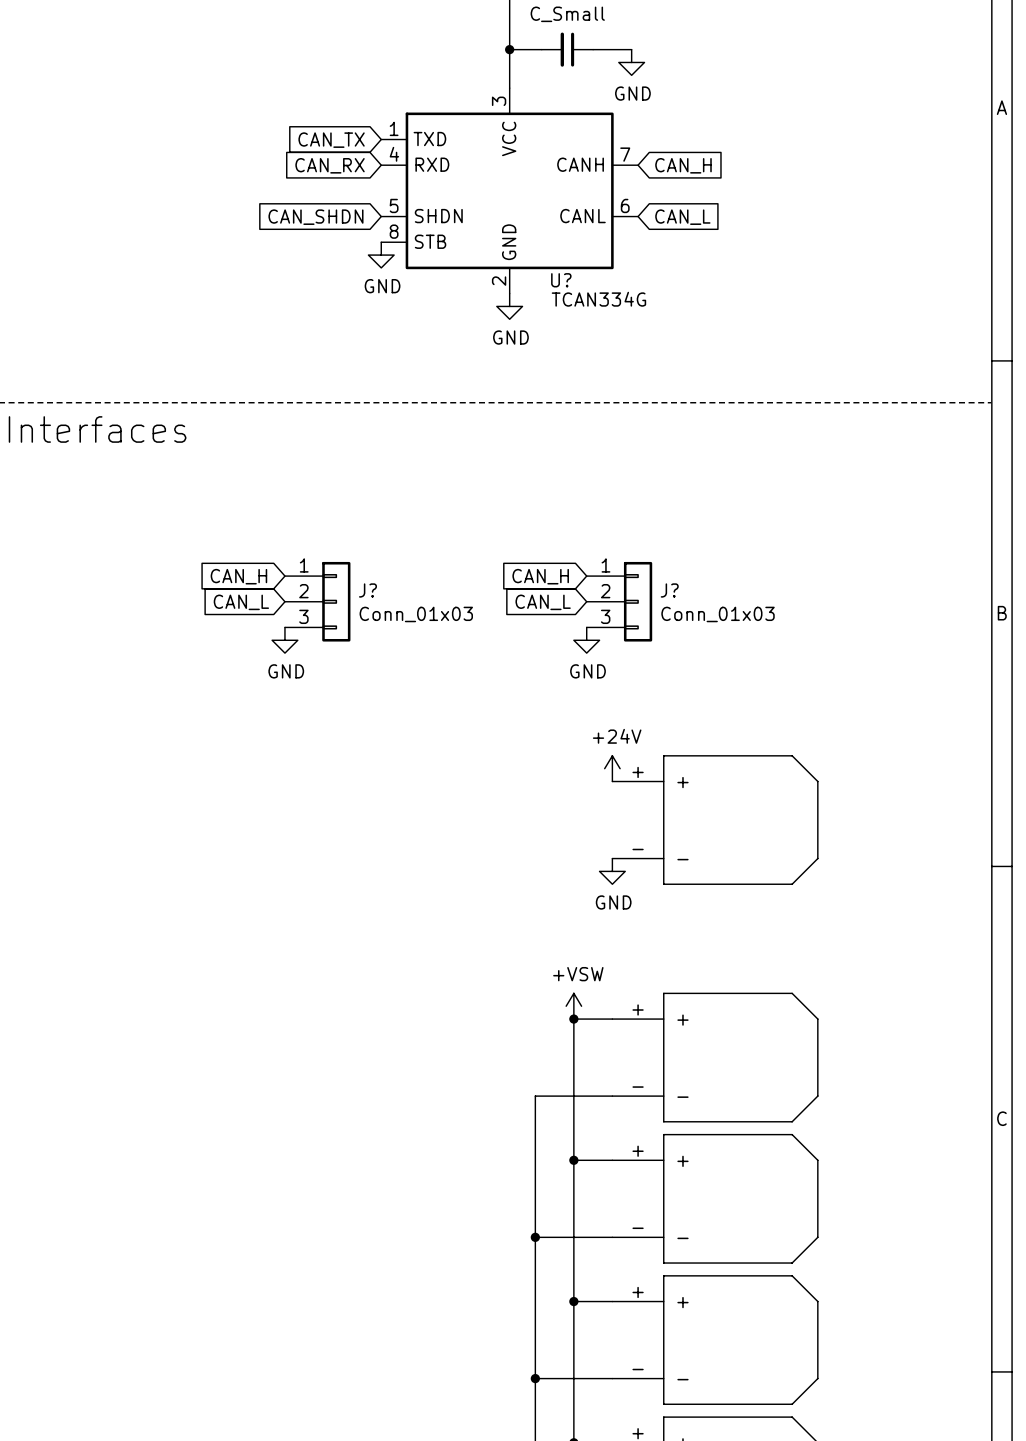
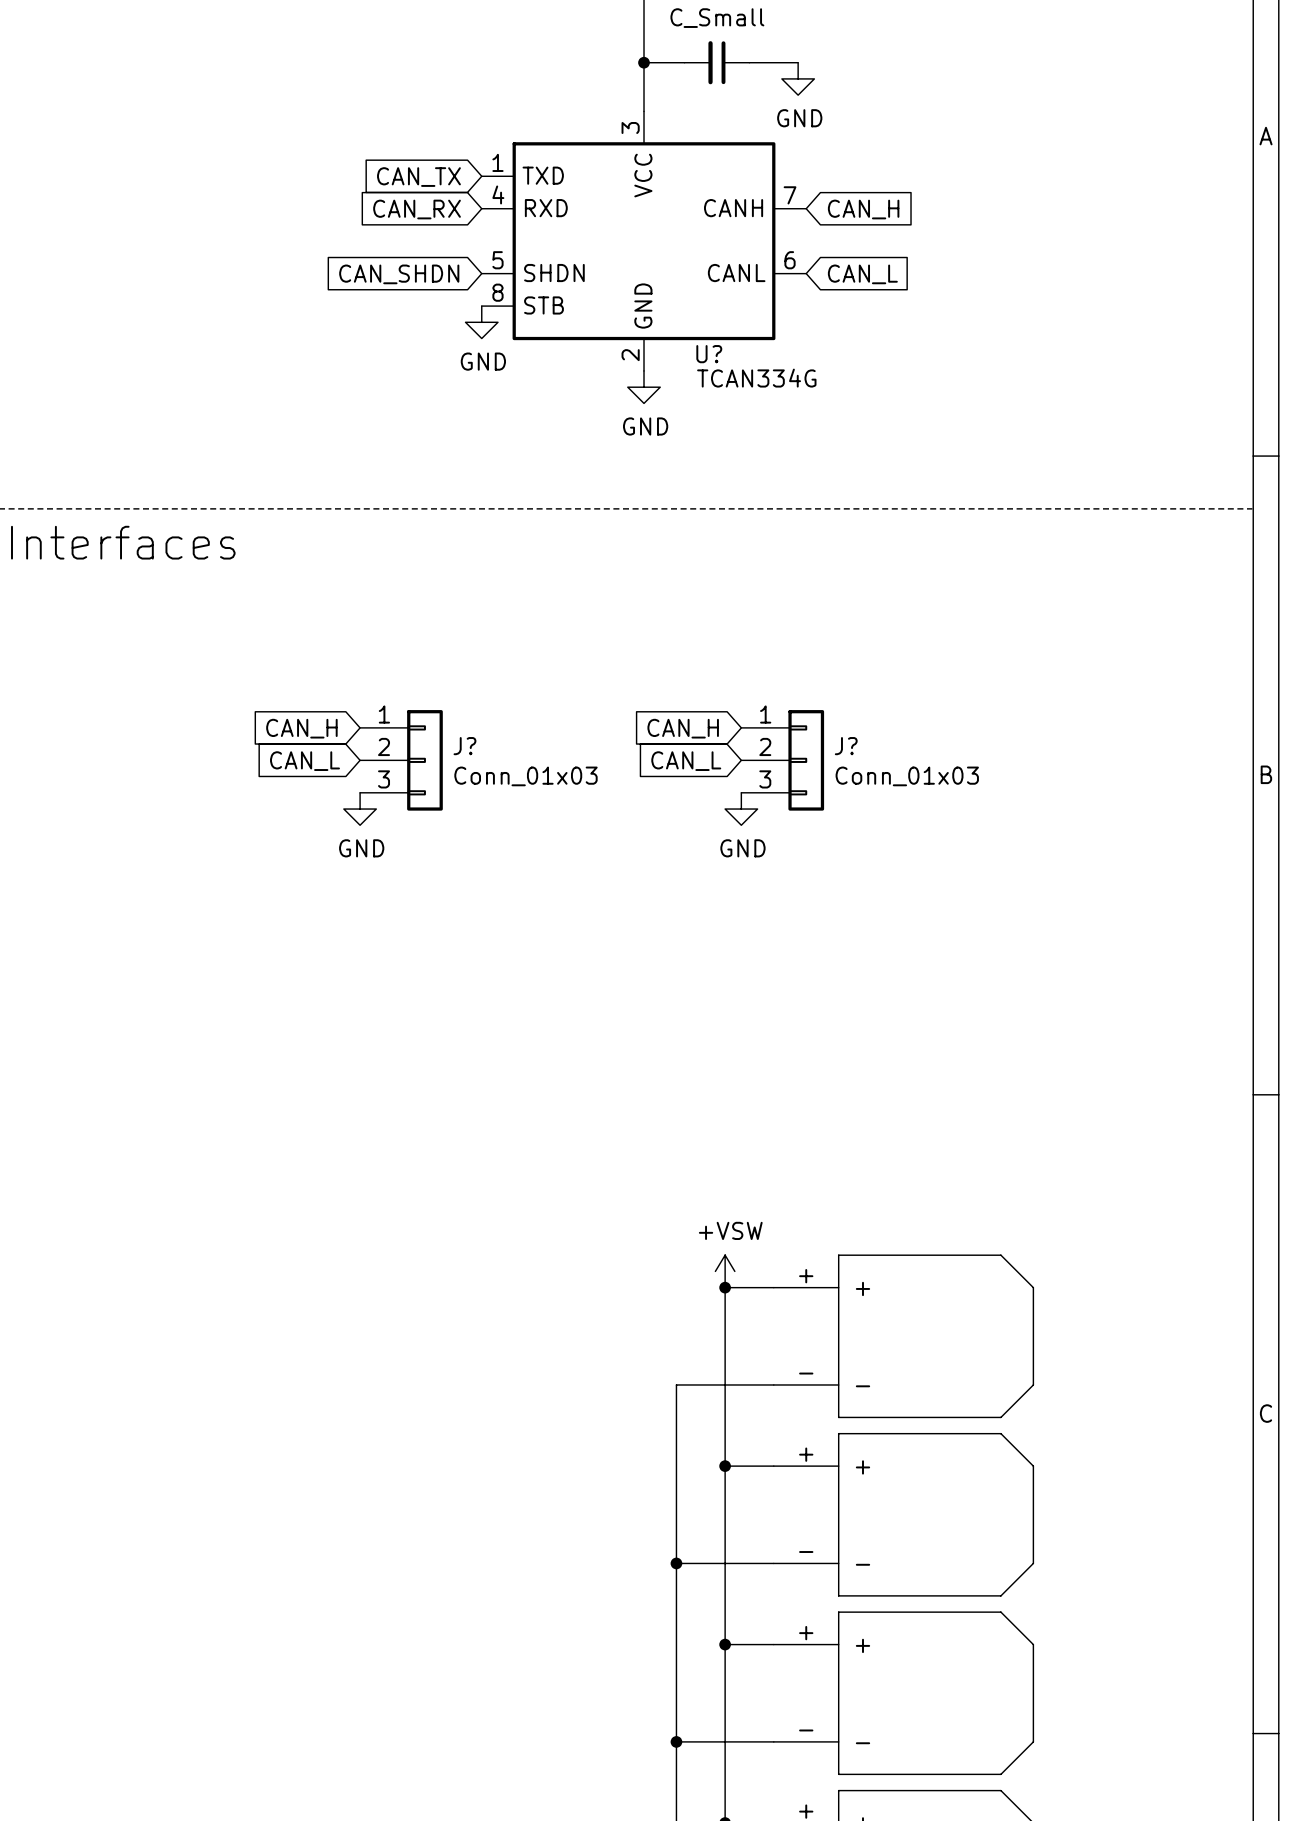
power symbol: +24V (612, 768) -> none
part: (715, 820) -> none
power symbol: GND (612, 871) -> none

